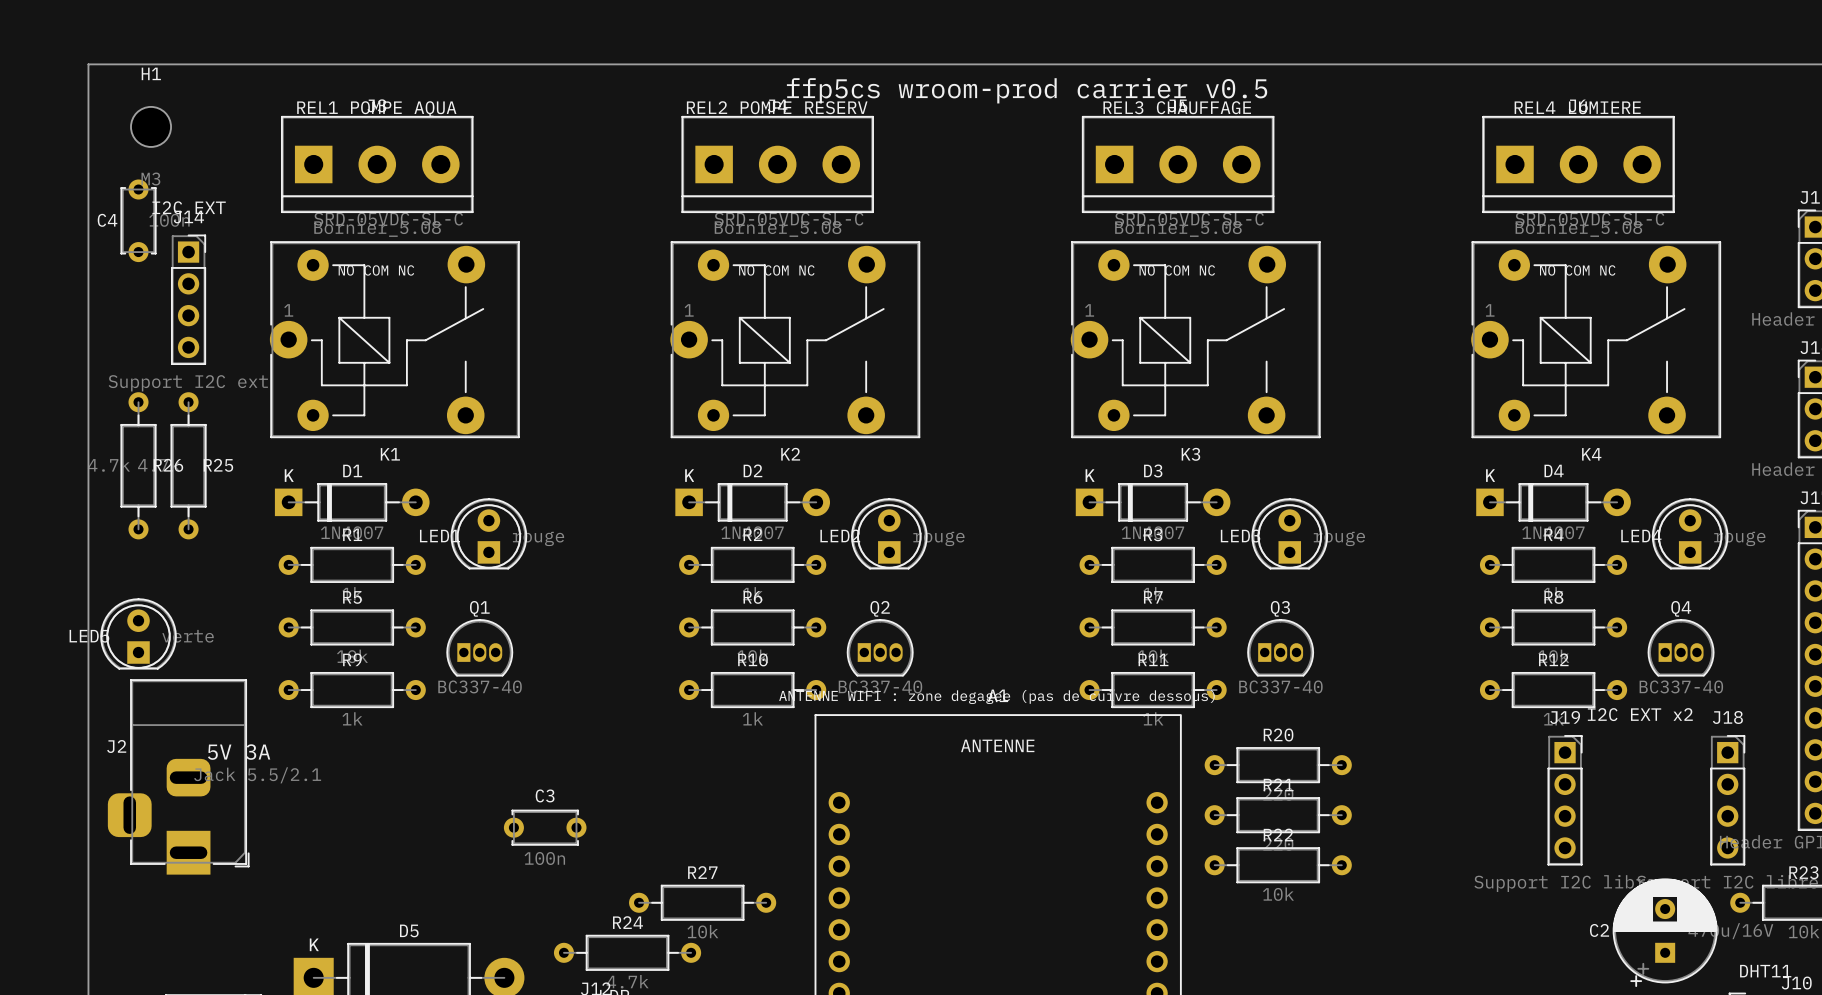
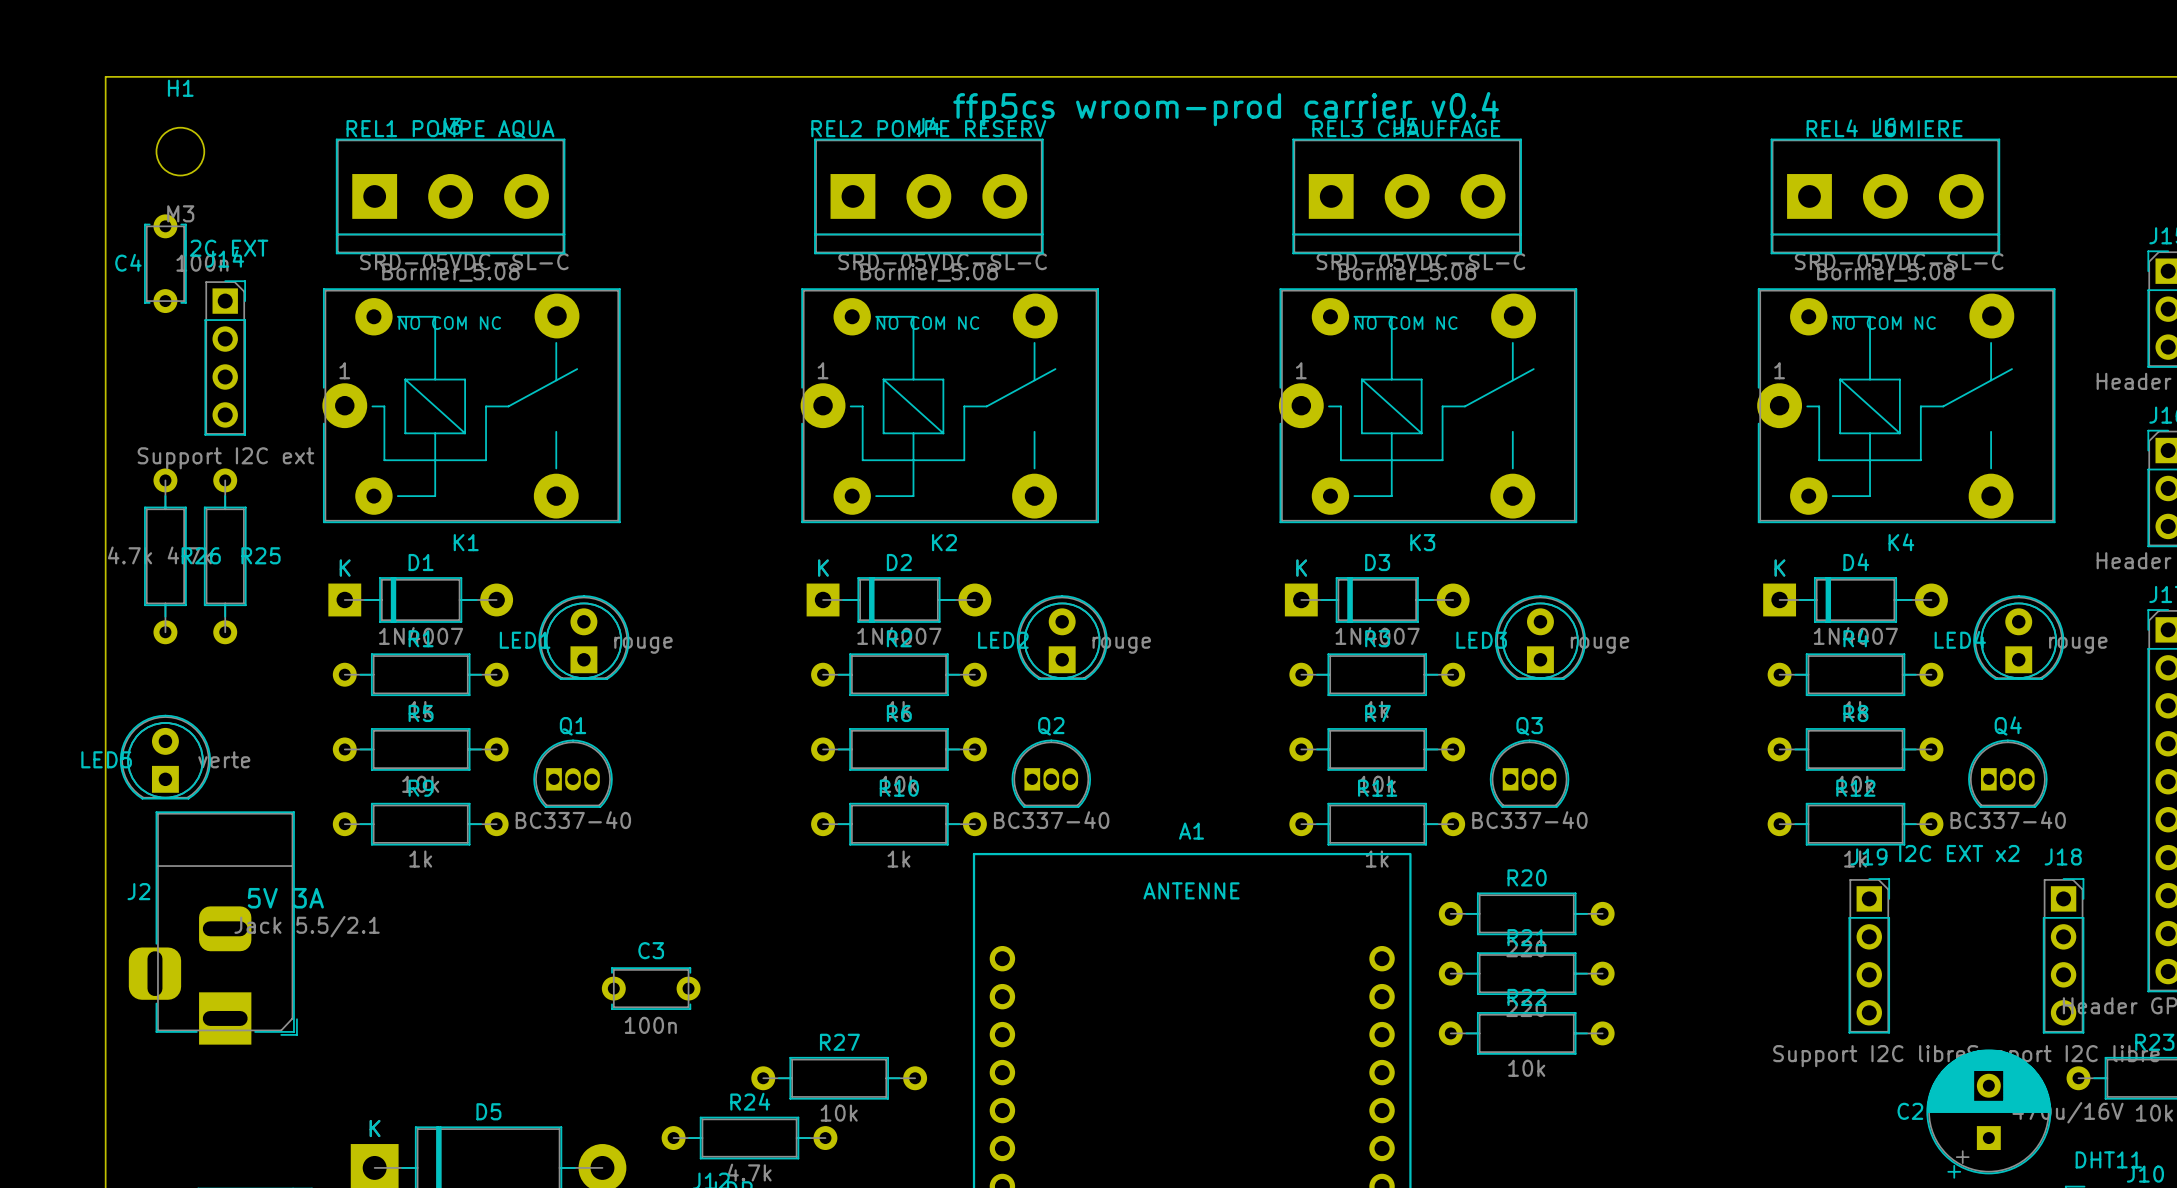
text: ffp5cs wroom-prod carrier v0.5 (1027, 90) -> ffp5cs wroom-prod carrier v0.4 (1226, 109)
text: ANTENNE WIFI : zone degagee (pas de cuivre dessous) (996, 697) -> none

